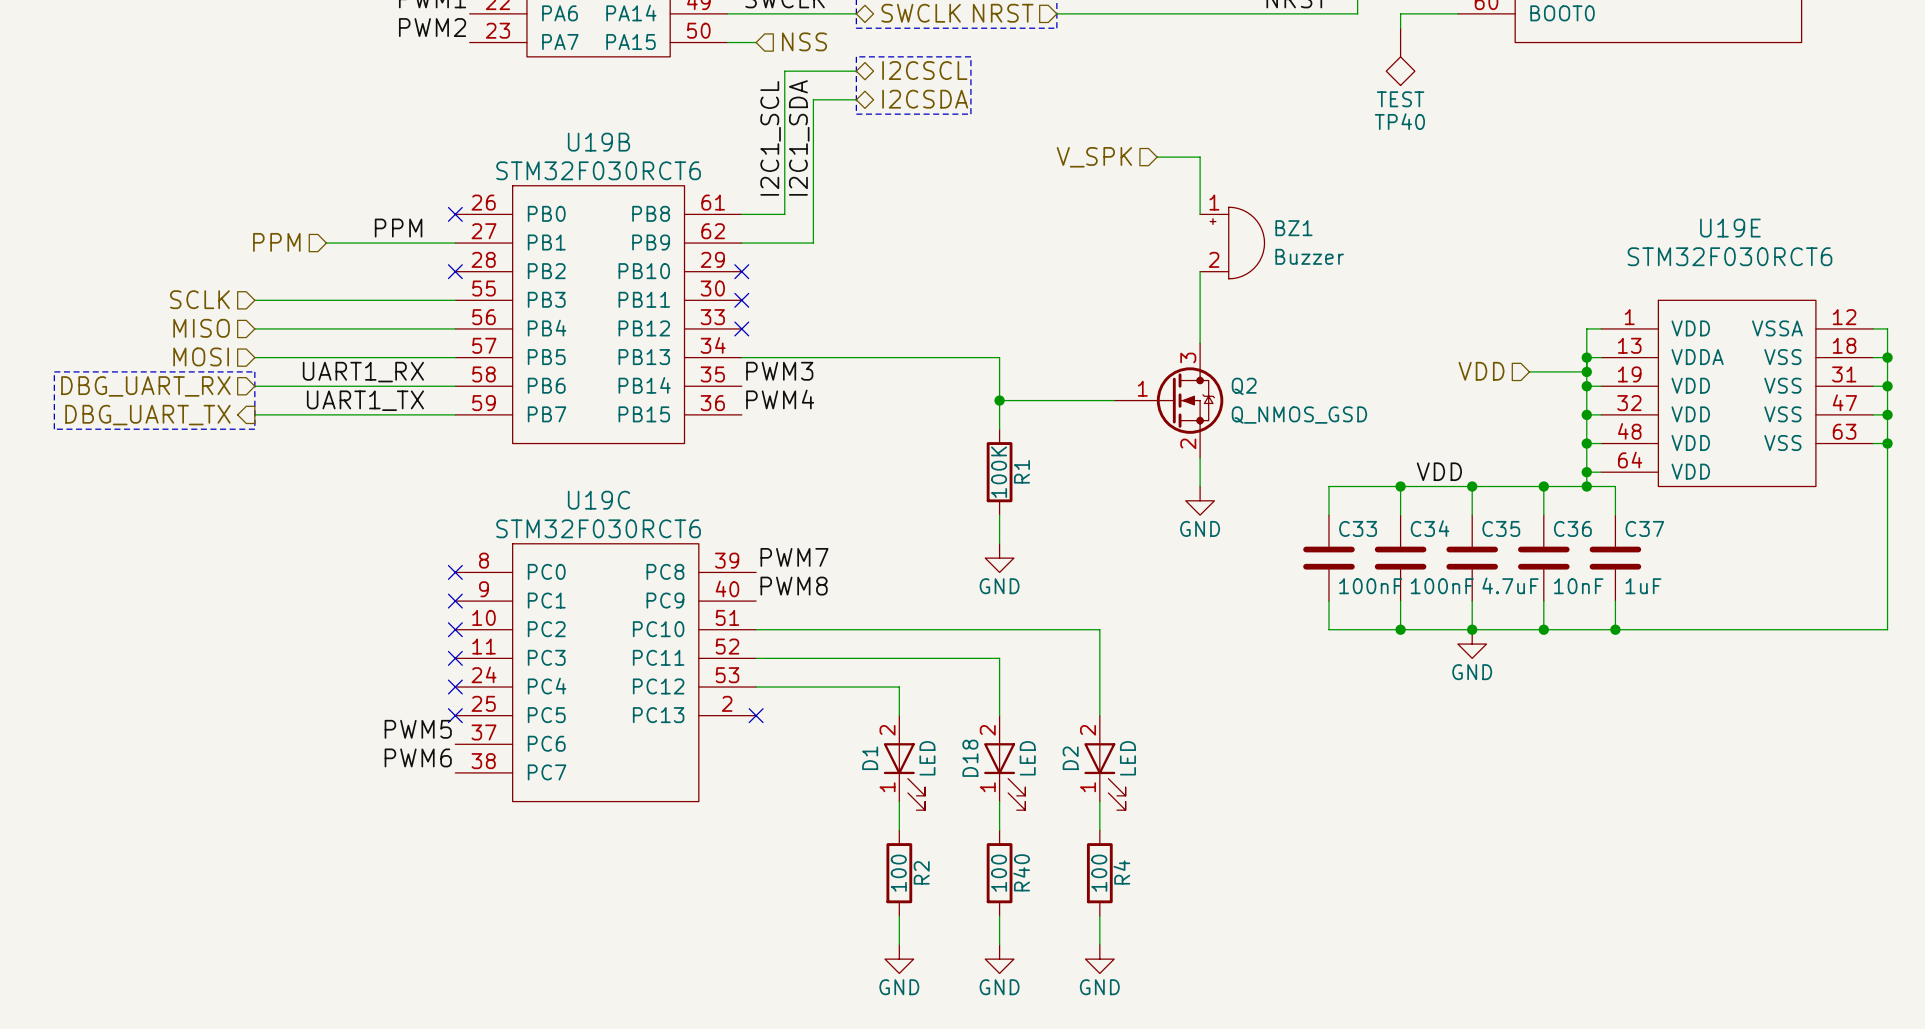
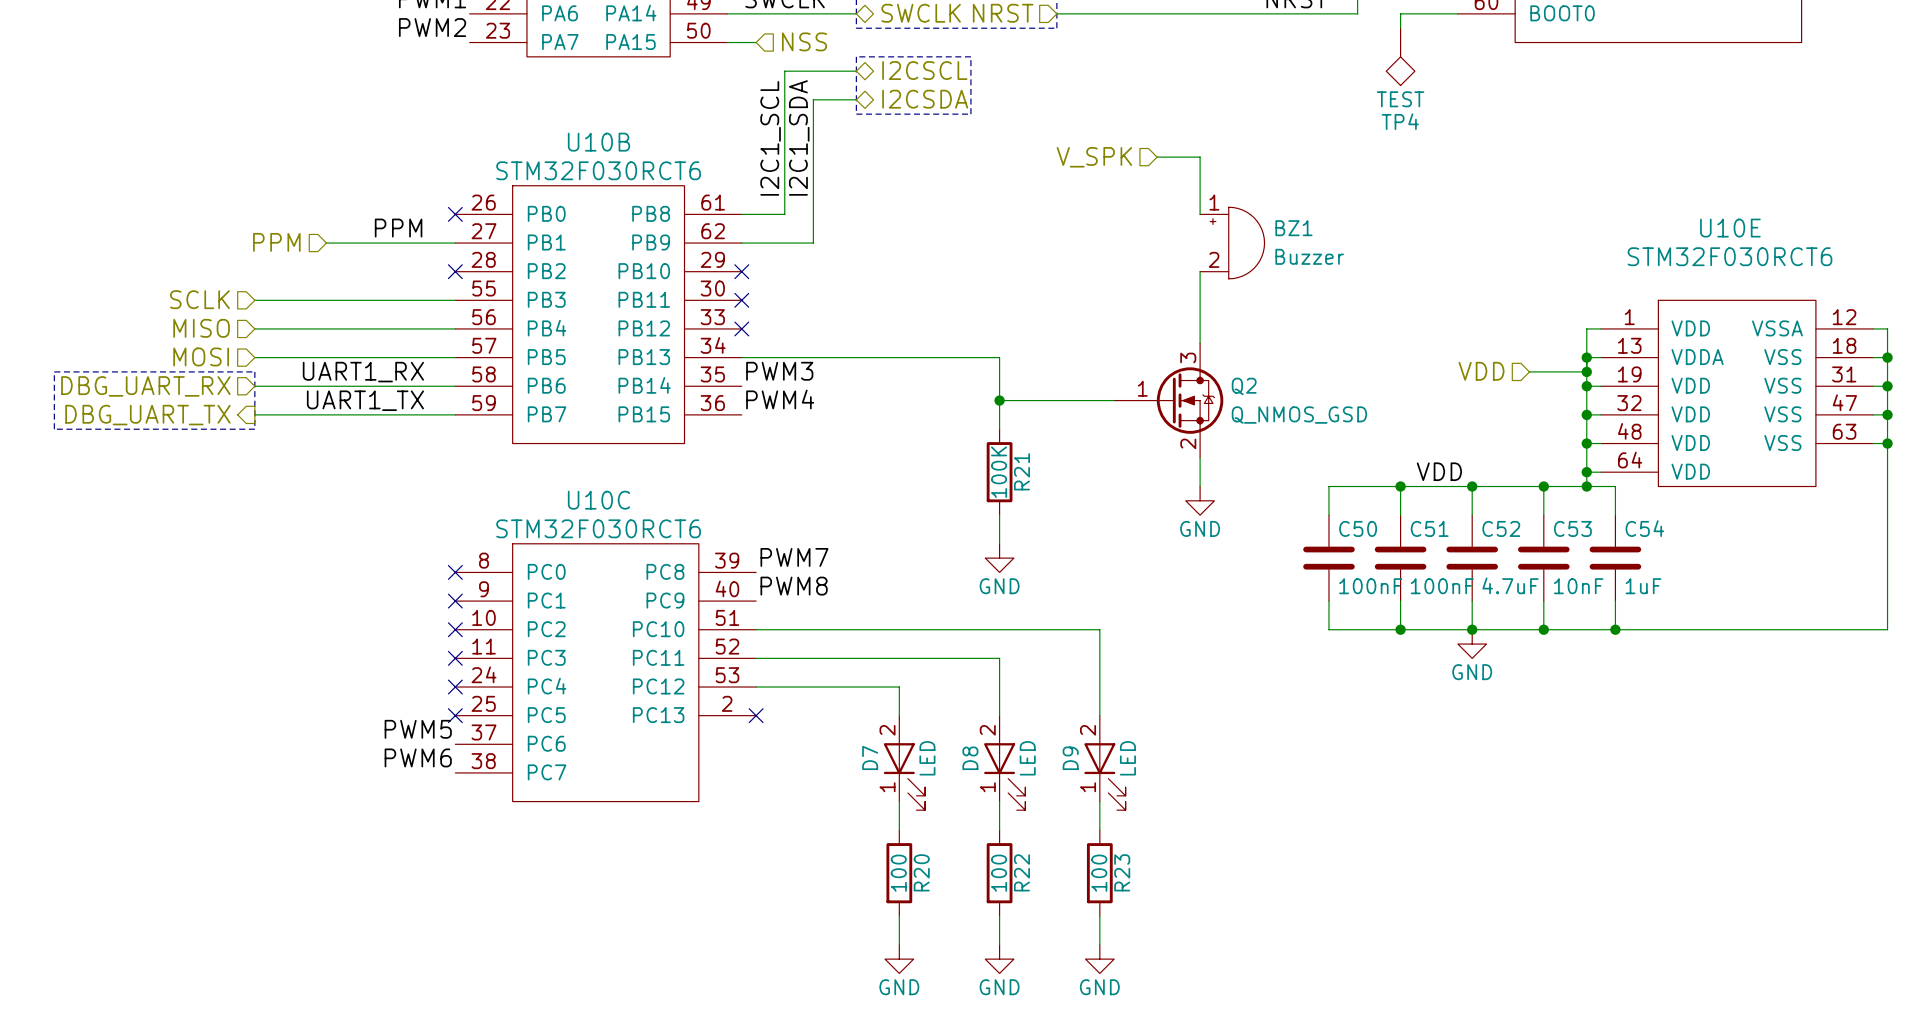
TP40 name: TP40 (1399, 121) -> TP4 (1400, 121)
U19B name: U19B (598, 142) -> U10B (598, 142)
U19E name: U19E (1730, 228) -> U10E (1730, 228)
R1 name: R1 (1021, 471) -> R21 (1021, 471)
U19C name: U19C (598, 500) -> U10C (598, 500)
C33 name: C33 (1358, 528) -> C50 (1358, 528)
C34 name: C34 (1430, 528) -> C51 (1429, 528)
C35 name: C35 (1501, 528) -> C52 (1501, 528)
C36 name: C36 (1572, 528) -> C53 (1572, 528)
C37 name: C37 (1644, 528) -> C54 (1644, 528)
D1 name: D1 (870, 758) -> D7 (870, 757)
D18 name: D18 (970, 758) -> D8 (970, 758)
D2 name: D2 (1070, 758) -> D9 (1070, 758)
R2 name: R2 (921, 872) -> R20 (921, 872)
R40 name: R40 (1021, 872) -> R22 (1021, 872)
R4 name: R4 (1121, 872) -> R23 (1122, 872)

